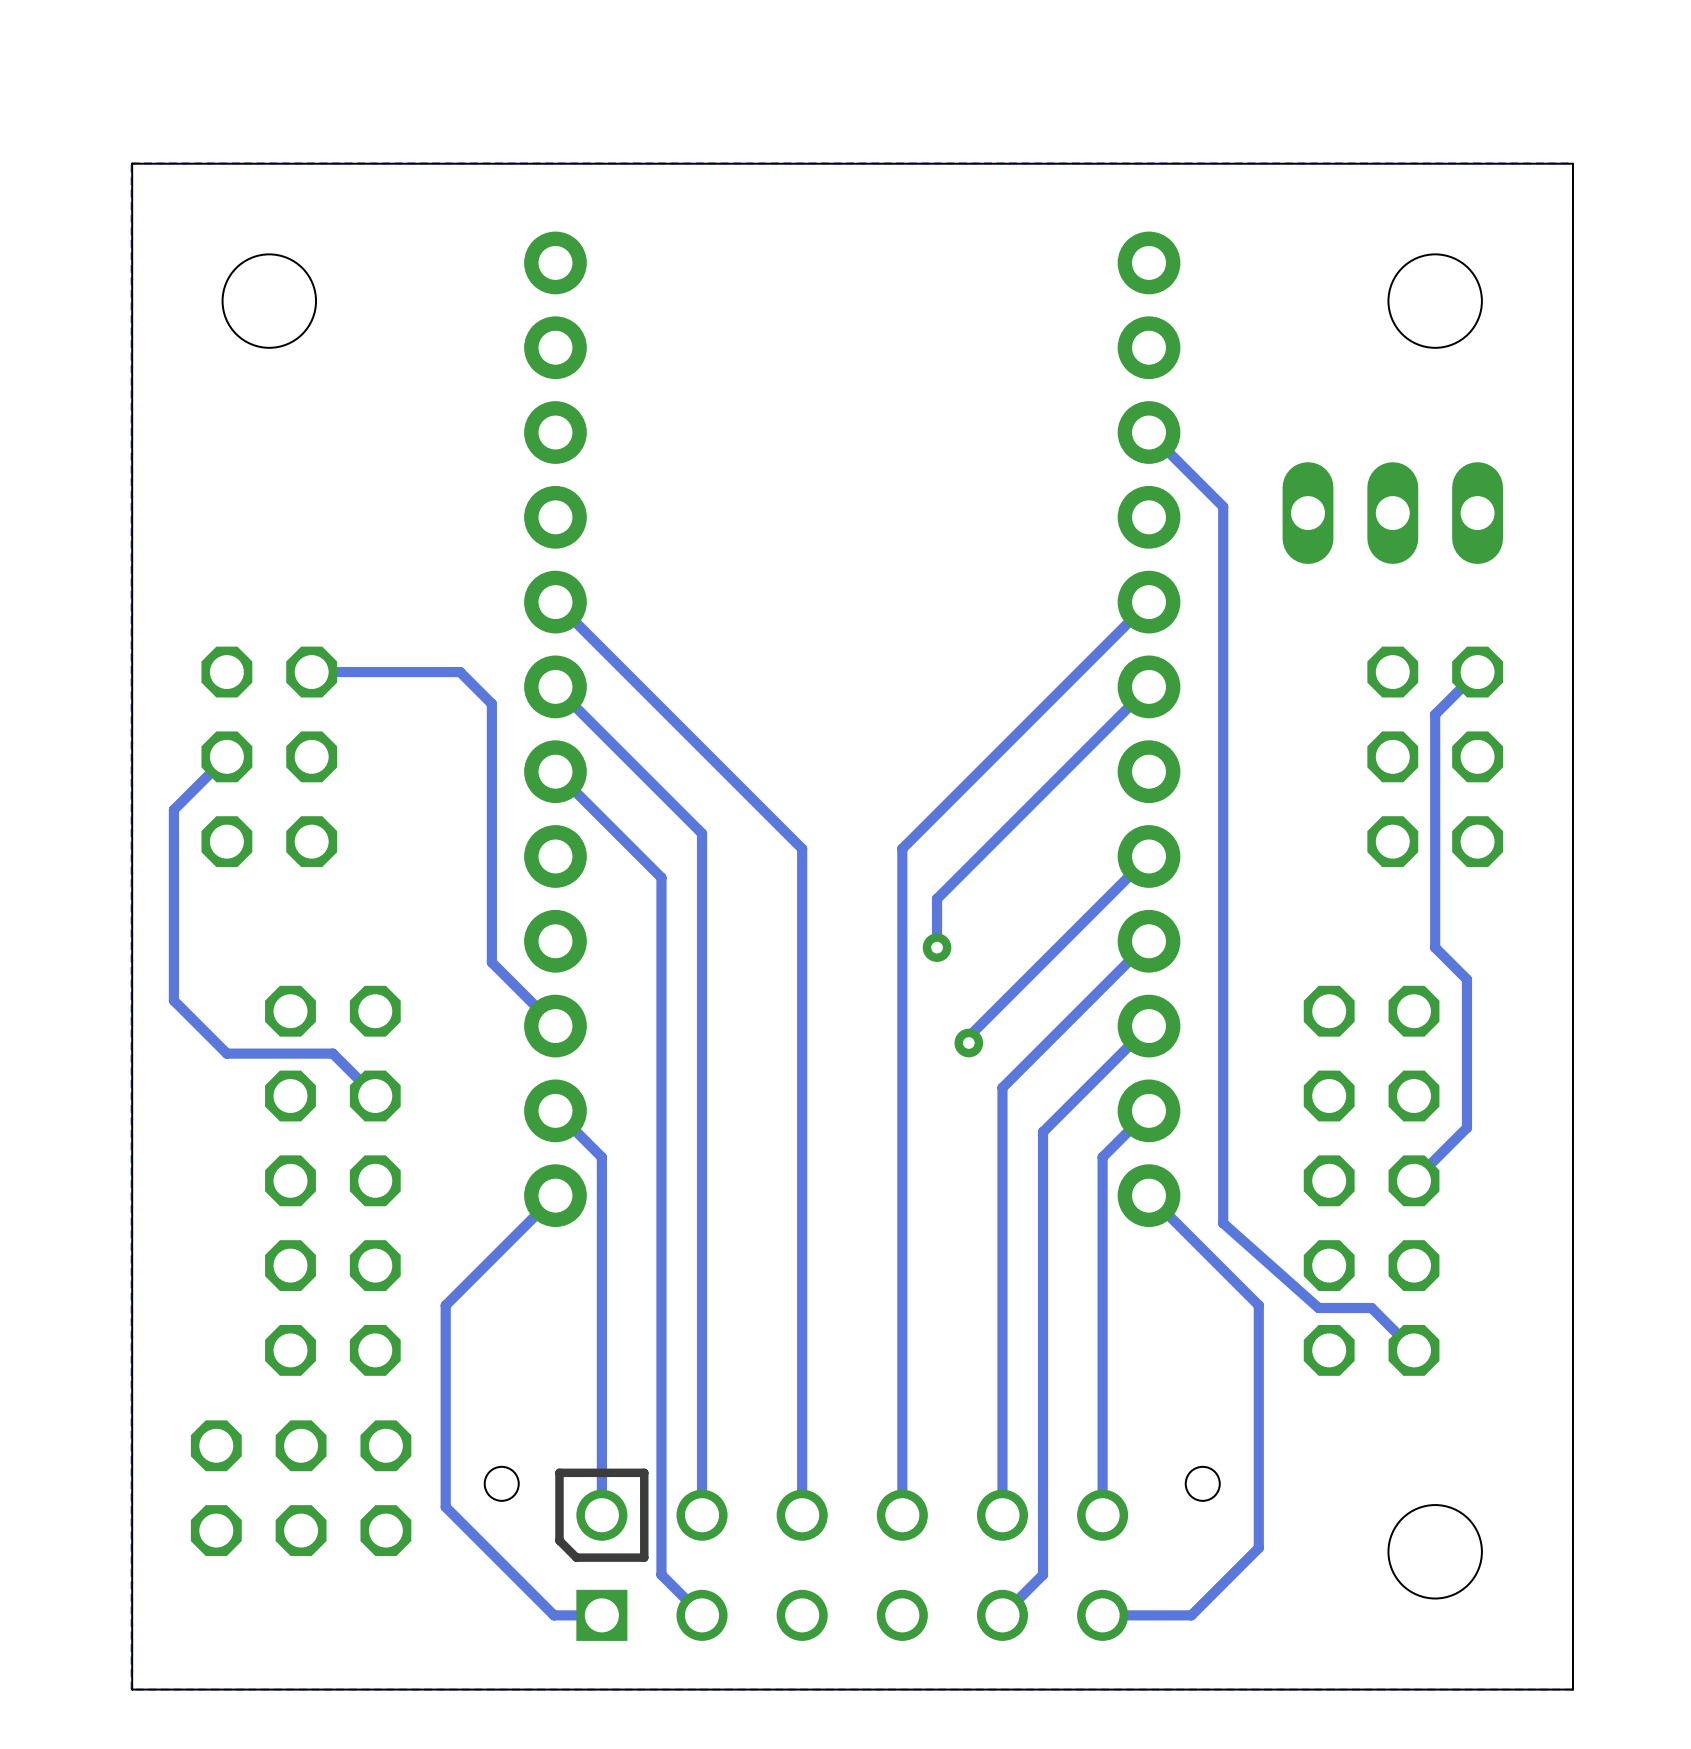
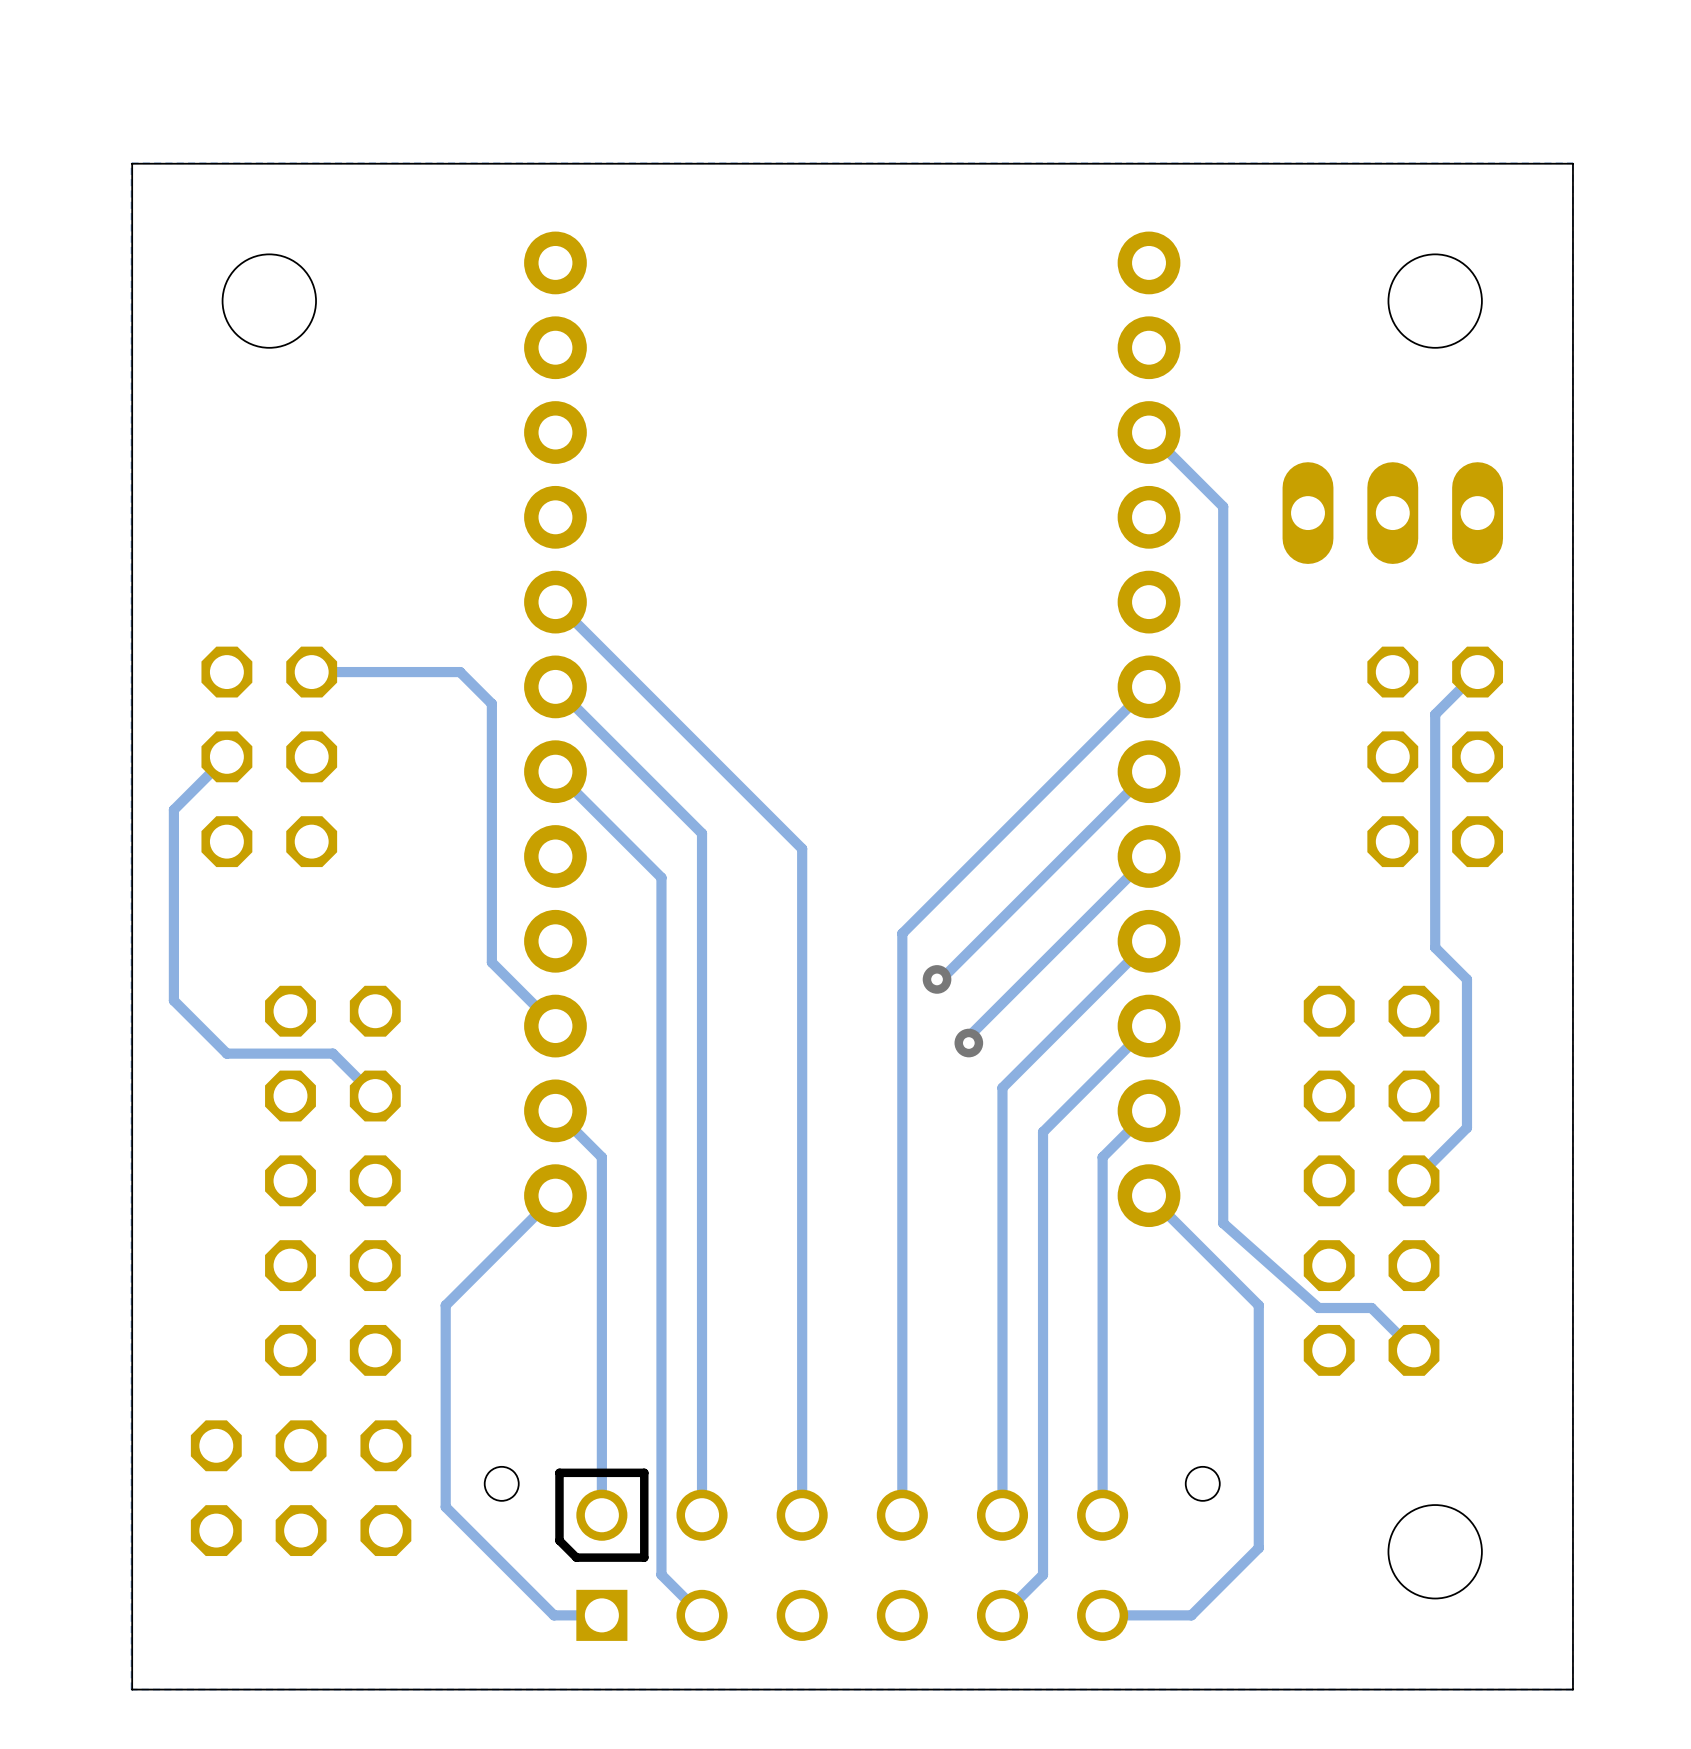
track: (1149, 602) (902, 848) (902, 933) -> none
track: none -> (1149, 771) (941, 979) (937, 979)
track: (937, 898) (937, 951) -> (937, 898) (902, 933)
via position: (937, 947) -> (937, 979)

